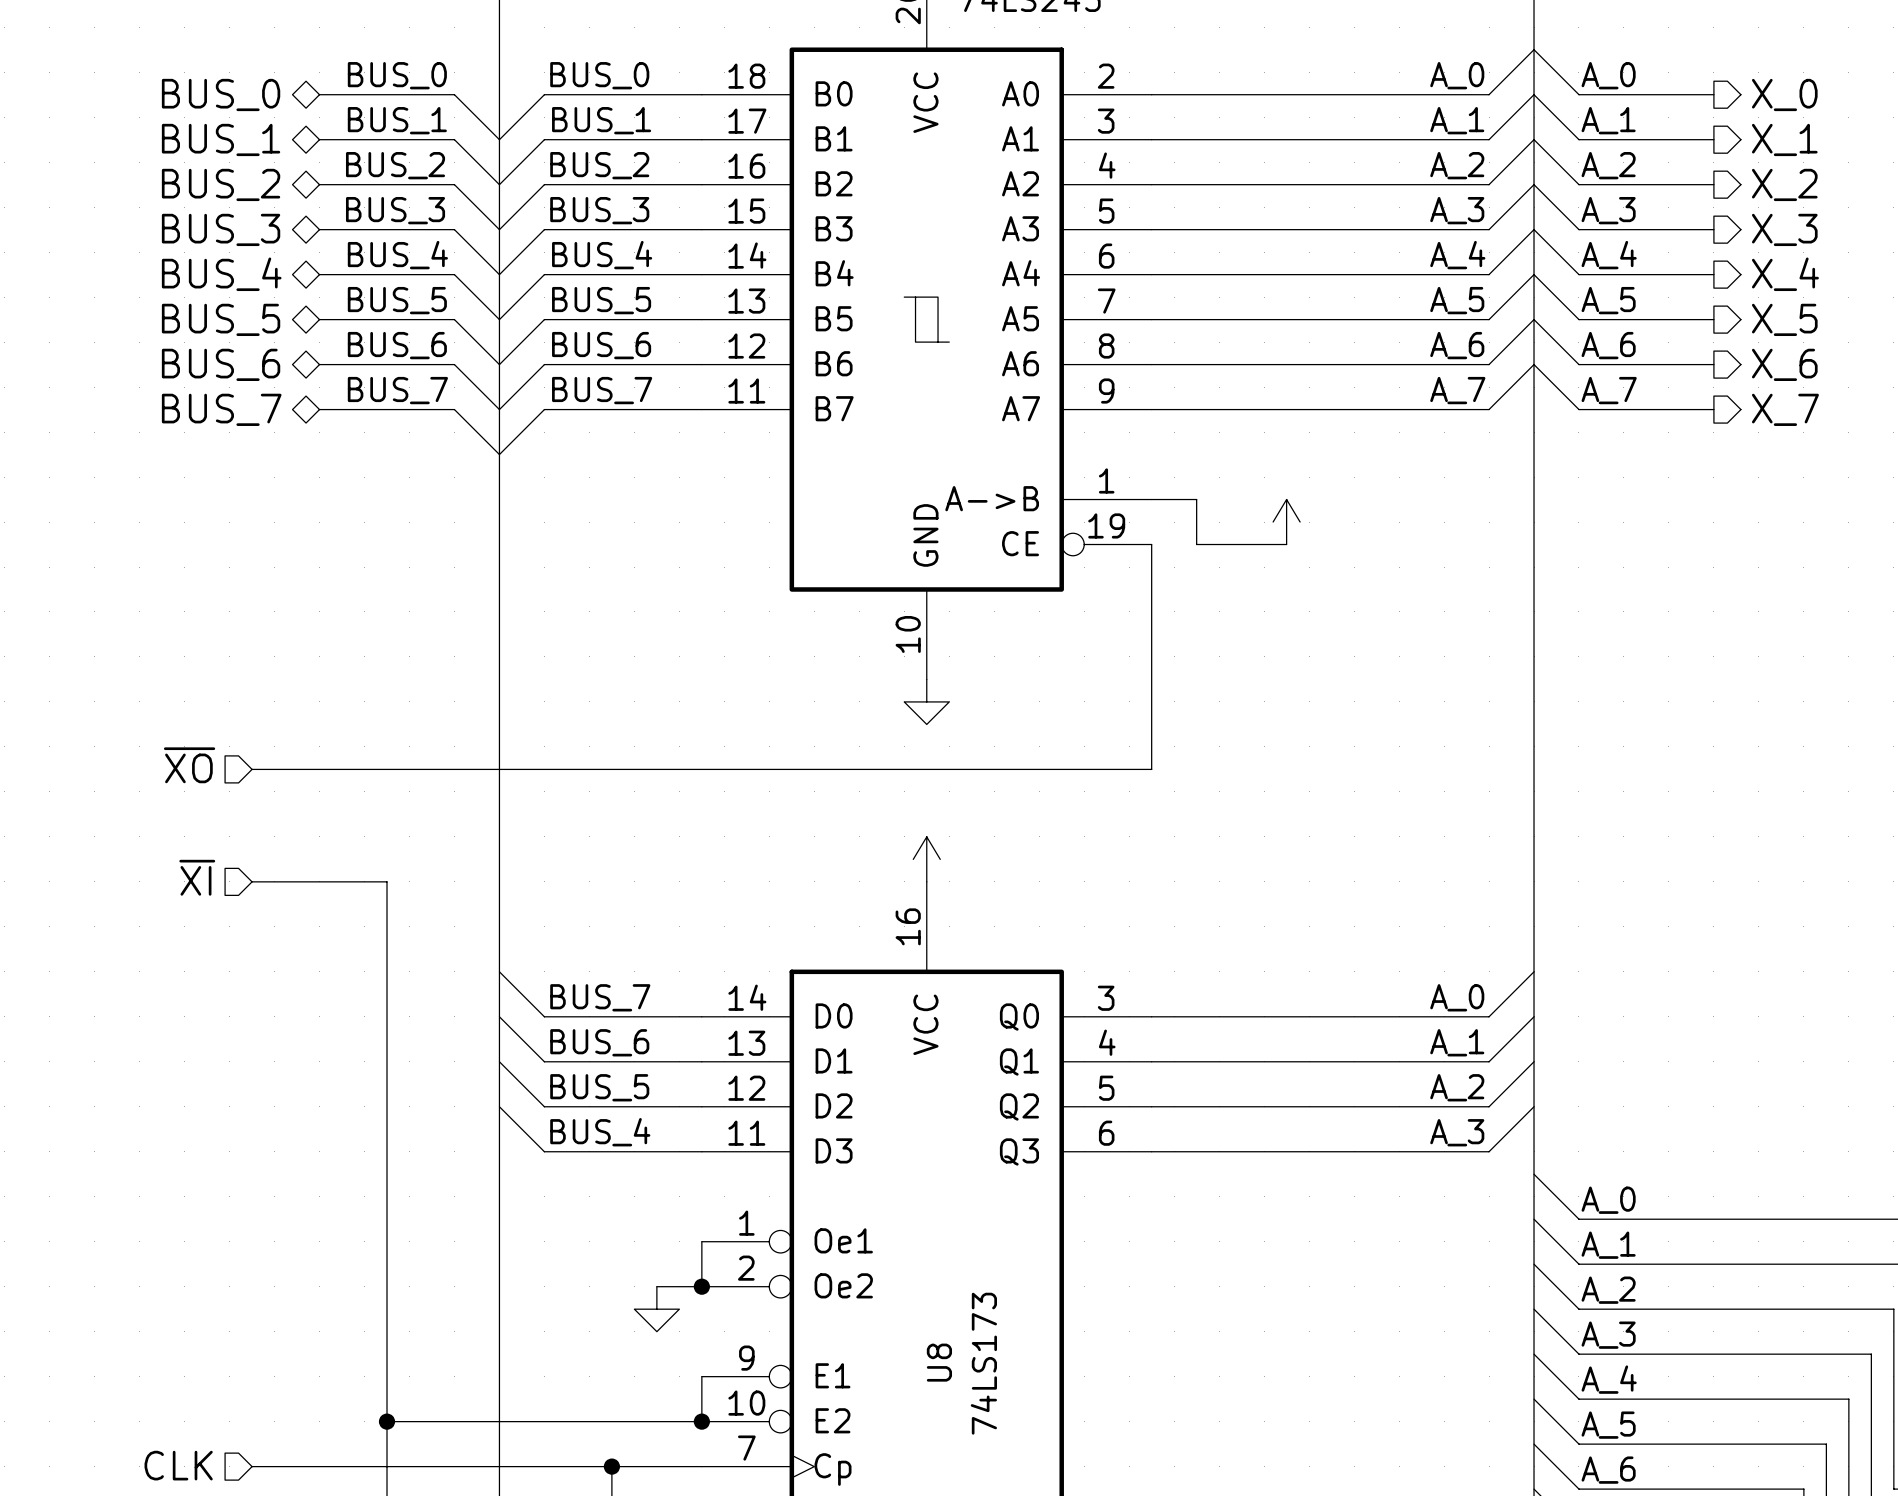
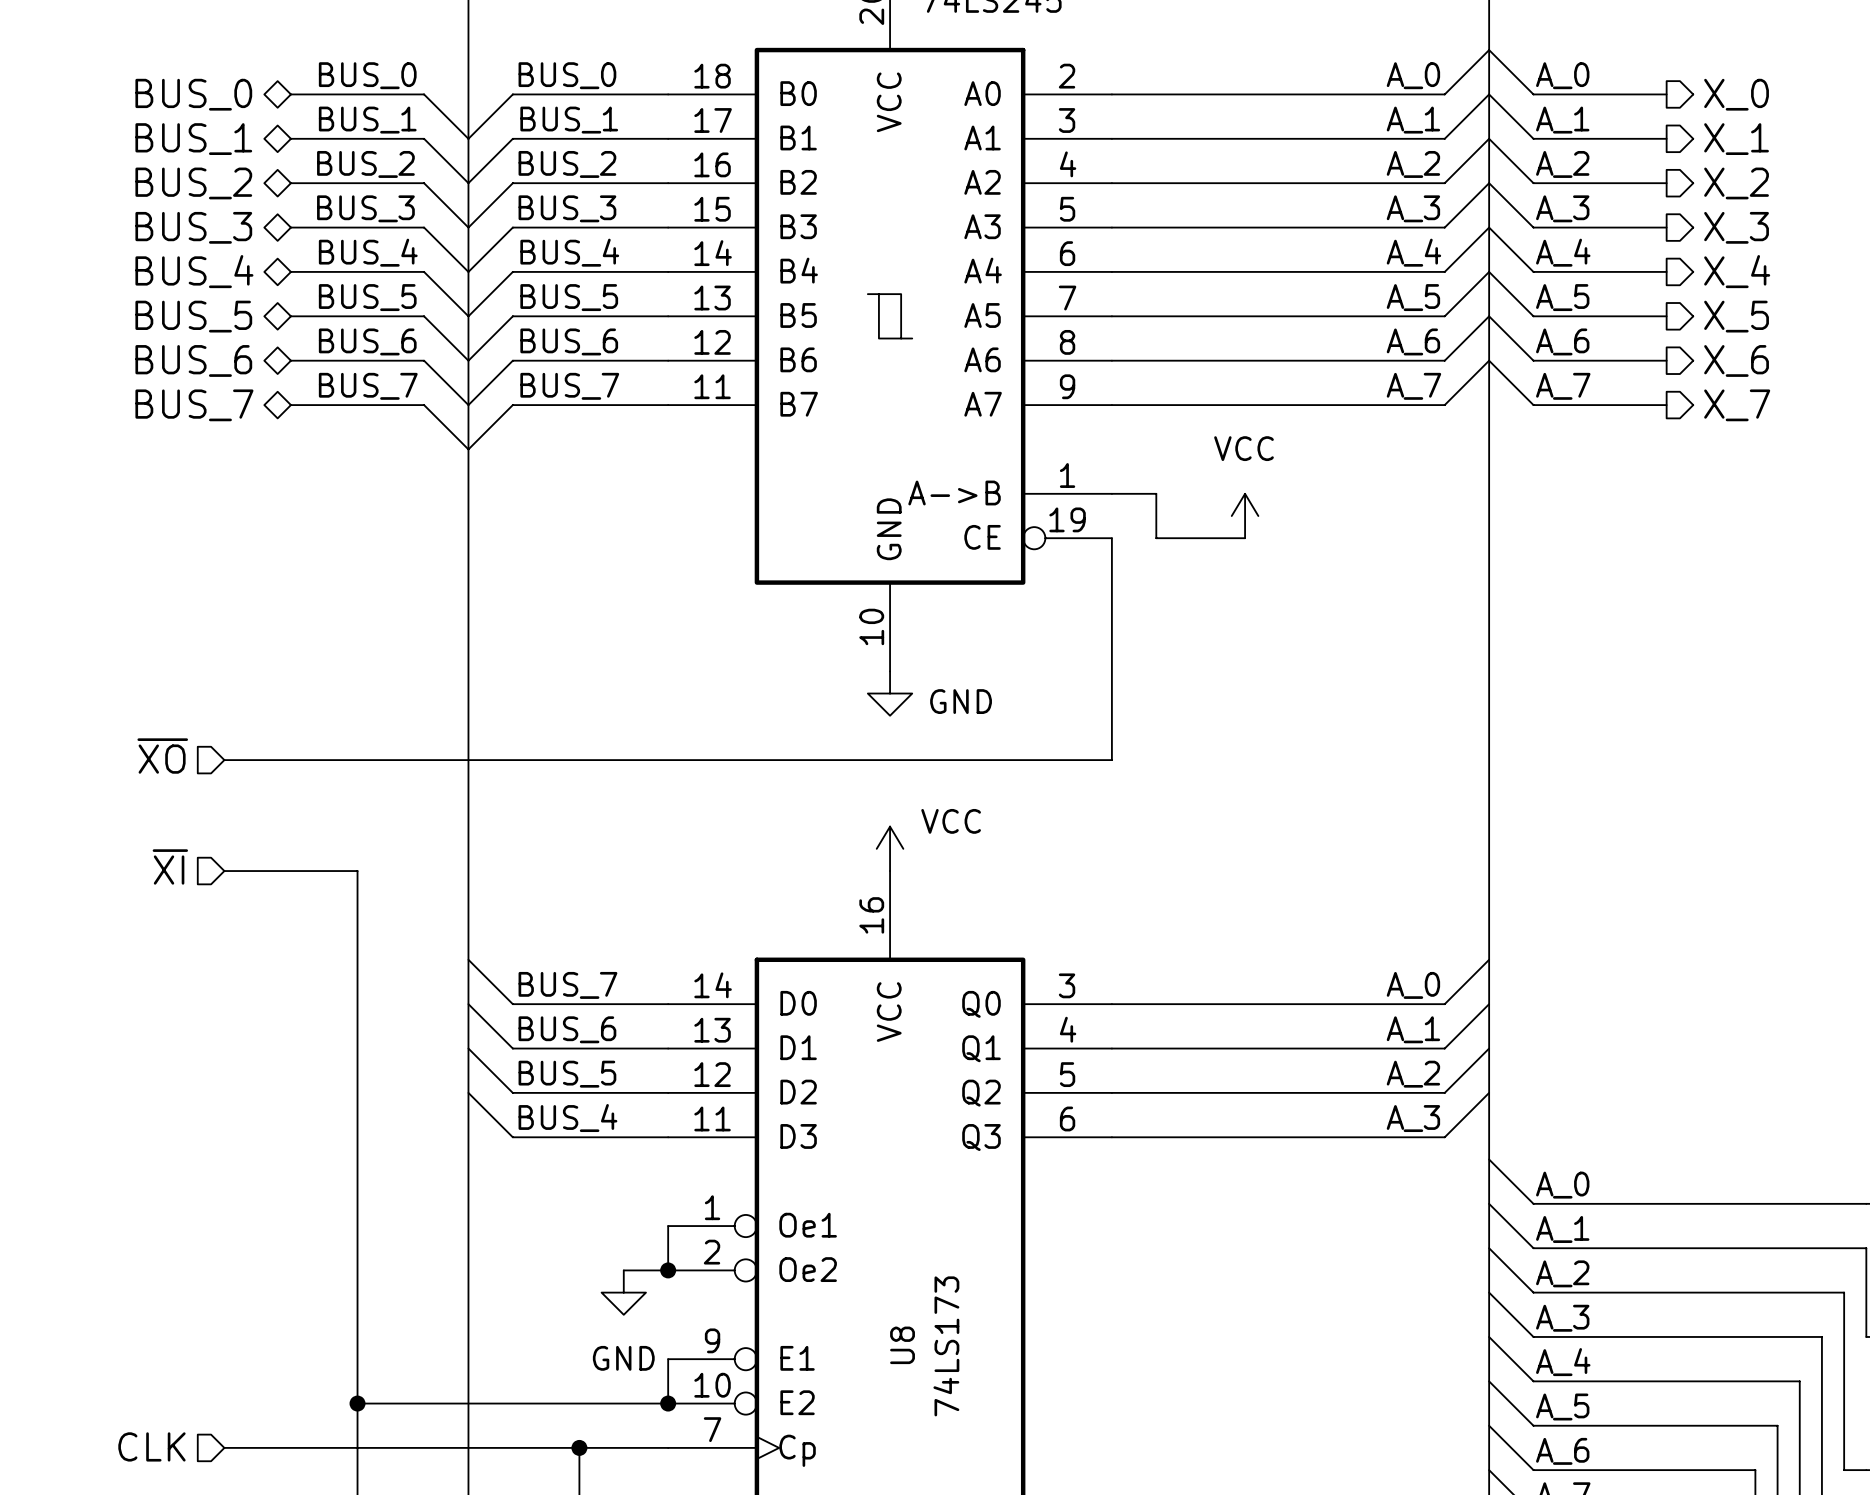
power symbol text: none -> VCC (1244, 448)
power symbol text: none -> GND (961, 701)
power symbol text: none -> VCC (951, 821)
power symbol text: none -> GND (623, 1358)

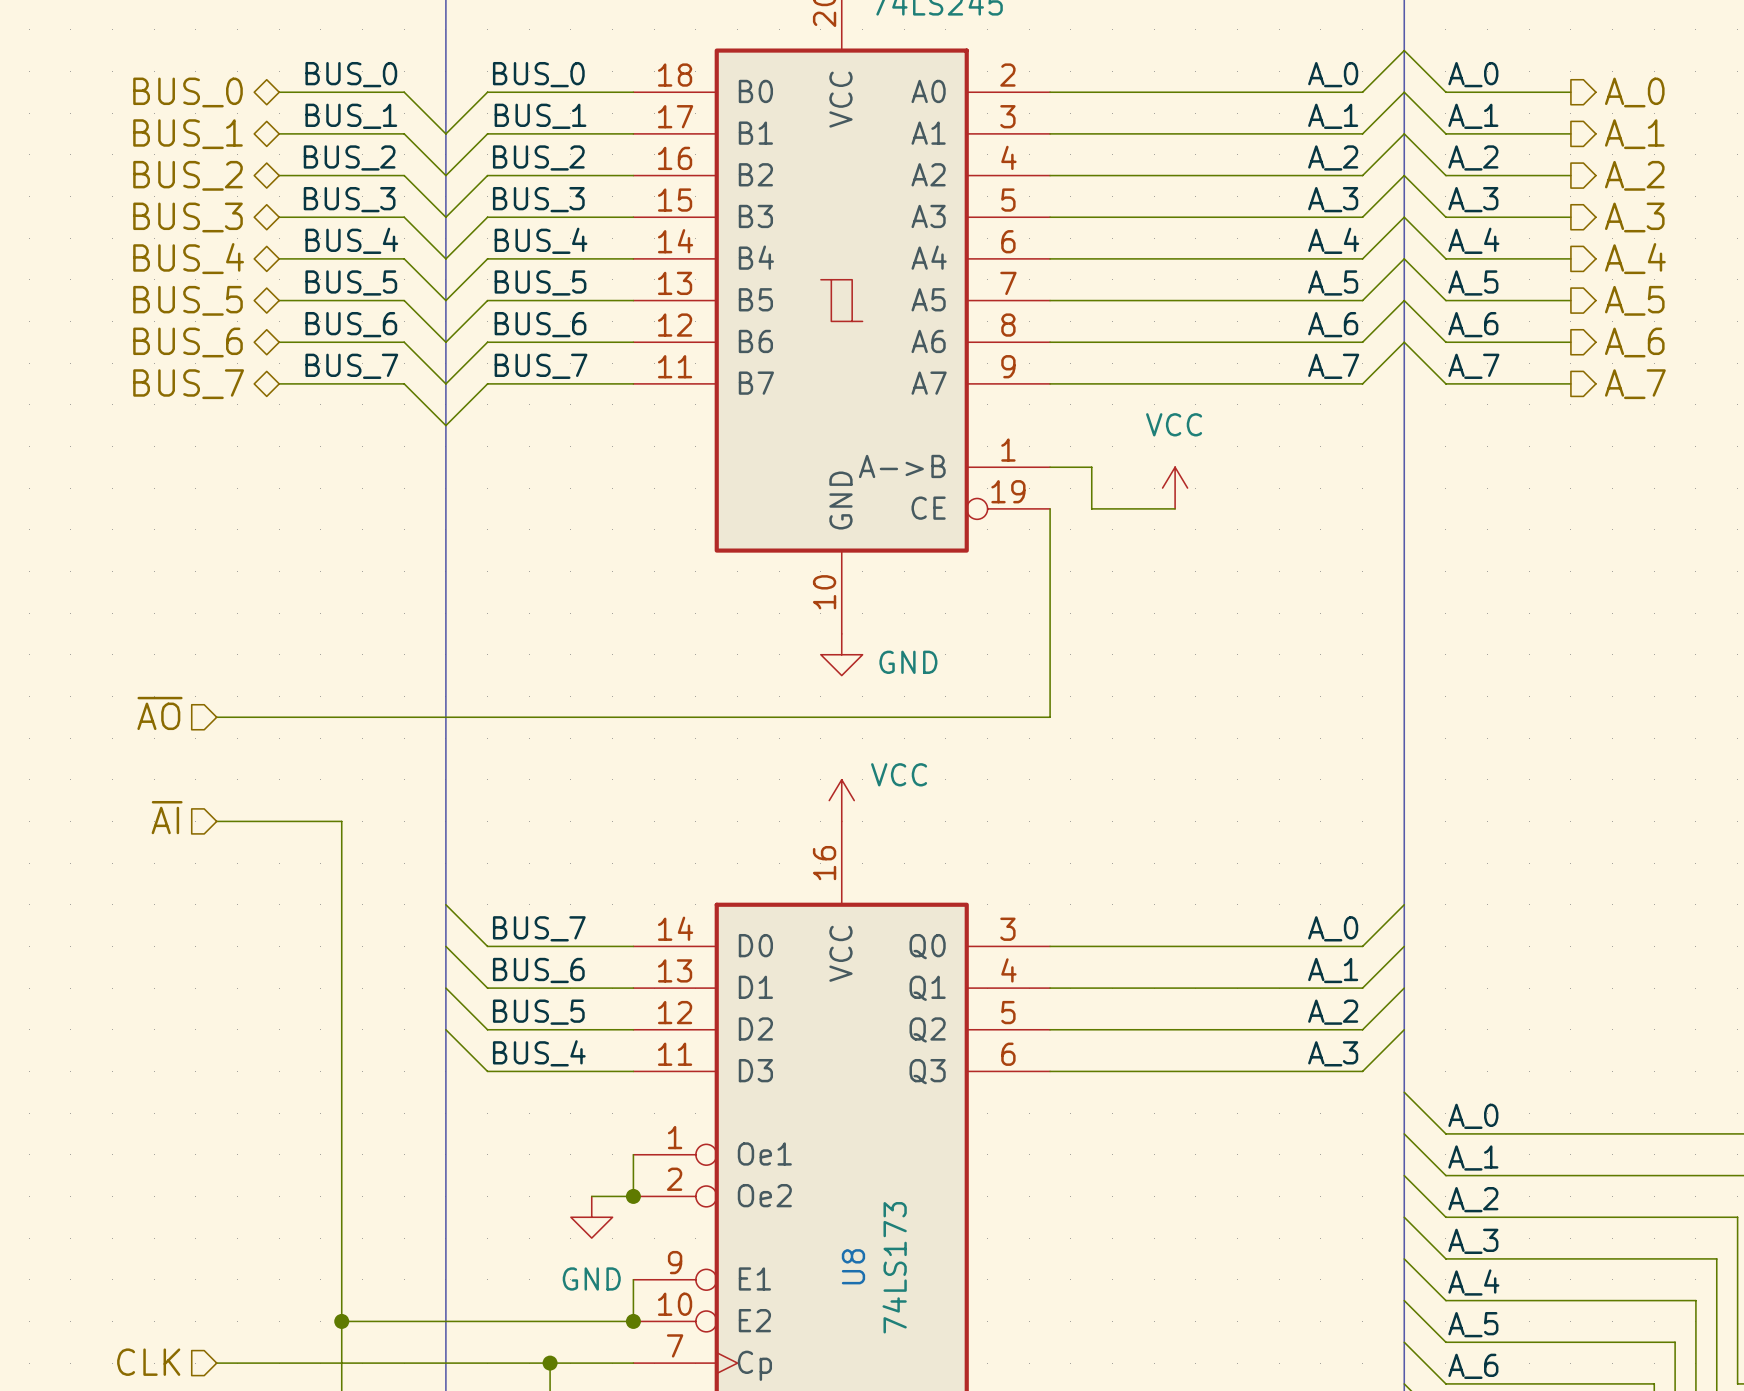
hierarchical label: X_0 (1736, 94) -> A_0 (1634, 92)
hierarchical label: X_1 (1736, 139) -> A_1 (1634, 134)
hierarchical label: X_2 (1736, 183) -> A_2 (1634, 175)
hierarchical label: X_3 (1736, 227) -> A_3 (1634, 217)
hierarchical label: X_4 (1737, 271) -> A_4 (1635, 258)
hierarchical label: X_5 (1736, 316) -> A_5 (1634, 300)
hierarchical label: X_6 (1736, 360) -> A_6 (1634, 342)
hierarchical label: X_7 (1737, 405) -> A_7 (1635, 384)
hierarchical label: ~{XO} (162, 756) -> ~{AO} (159, 713)
hierarchical label: ~{XI} (170, 866) -> ~{AI} (167, 817)

